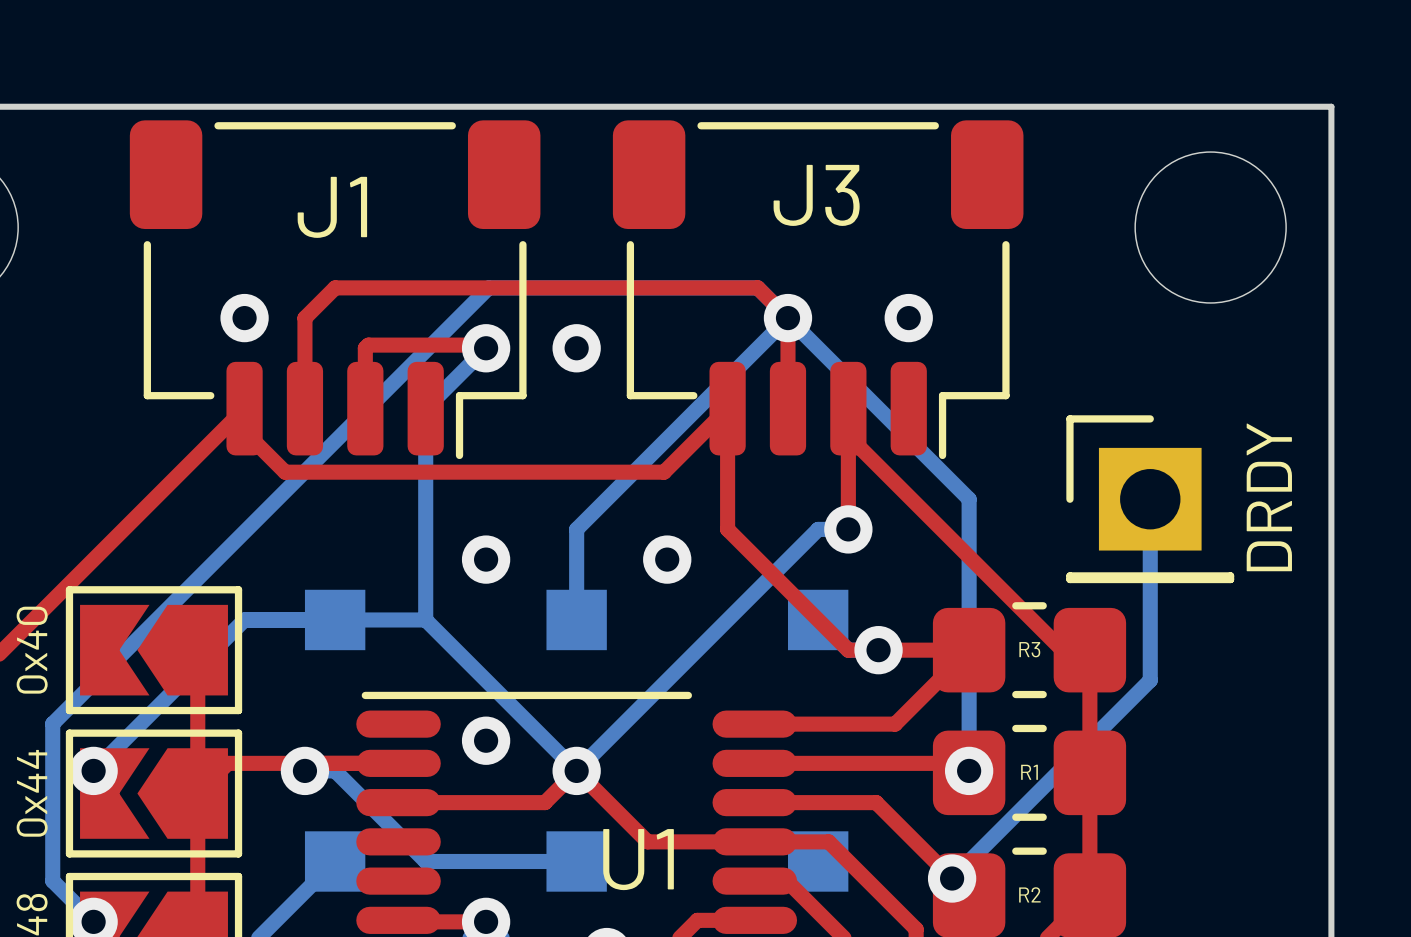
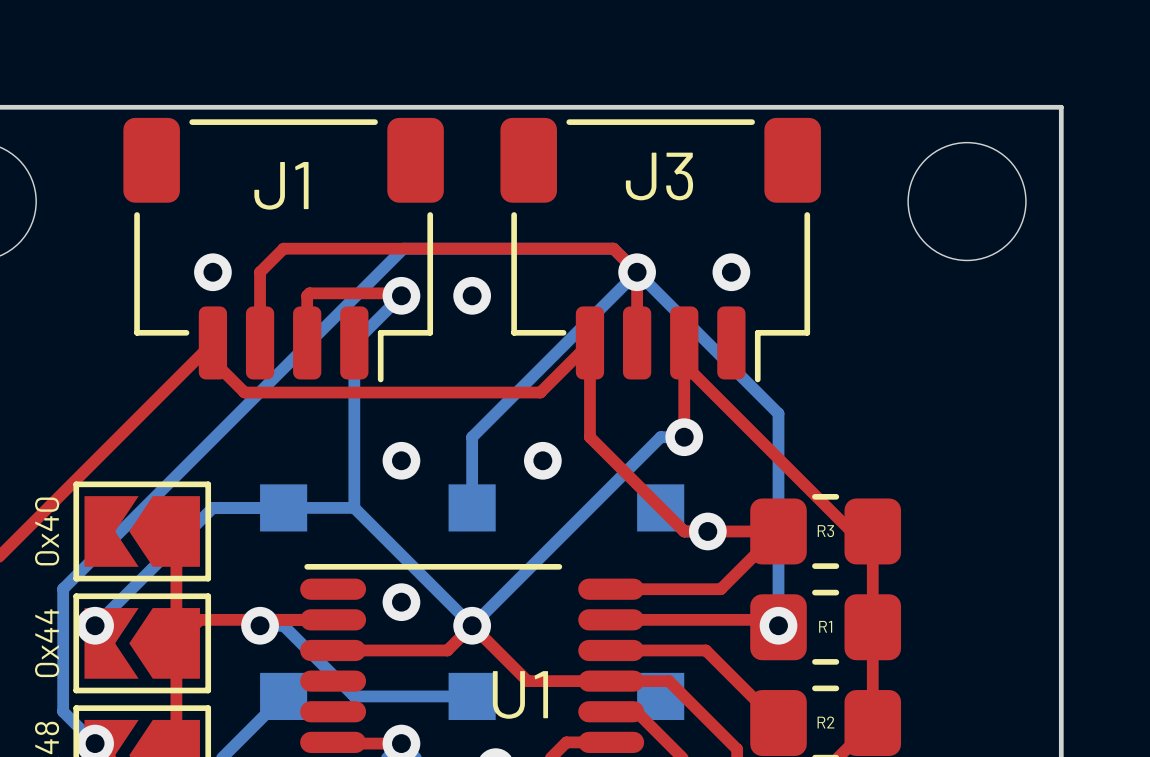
bottom track: (1150, 499) (1150, 680) (952, 878) -> none
part: DRDY (1150, 499) -> none
via: (952, 878) -> none

